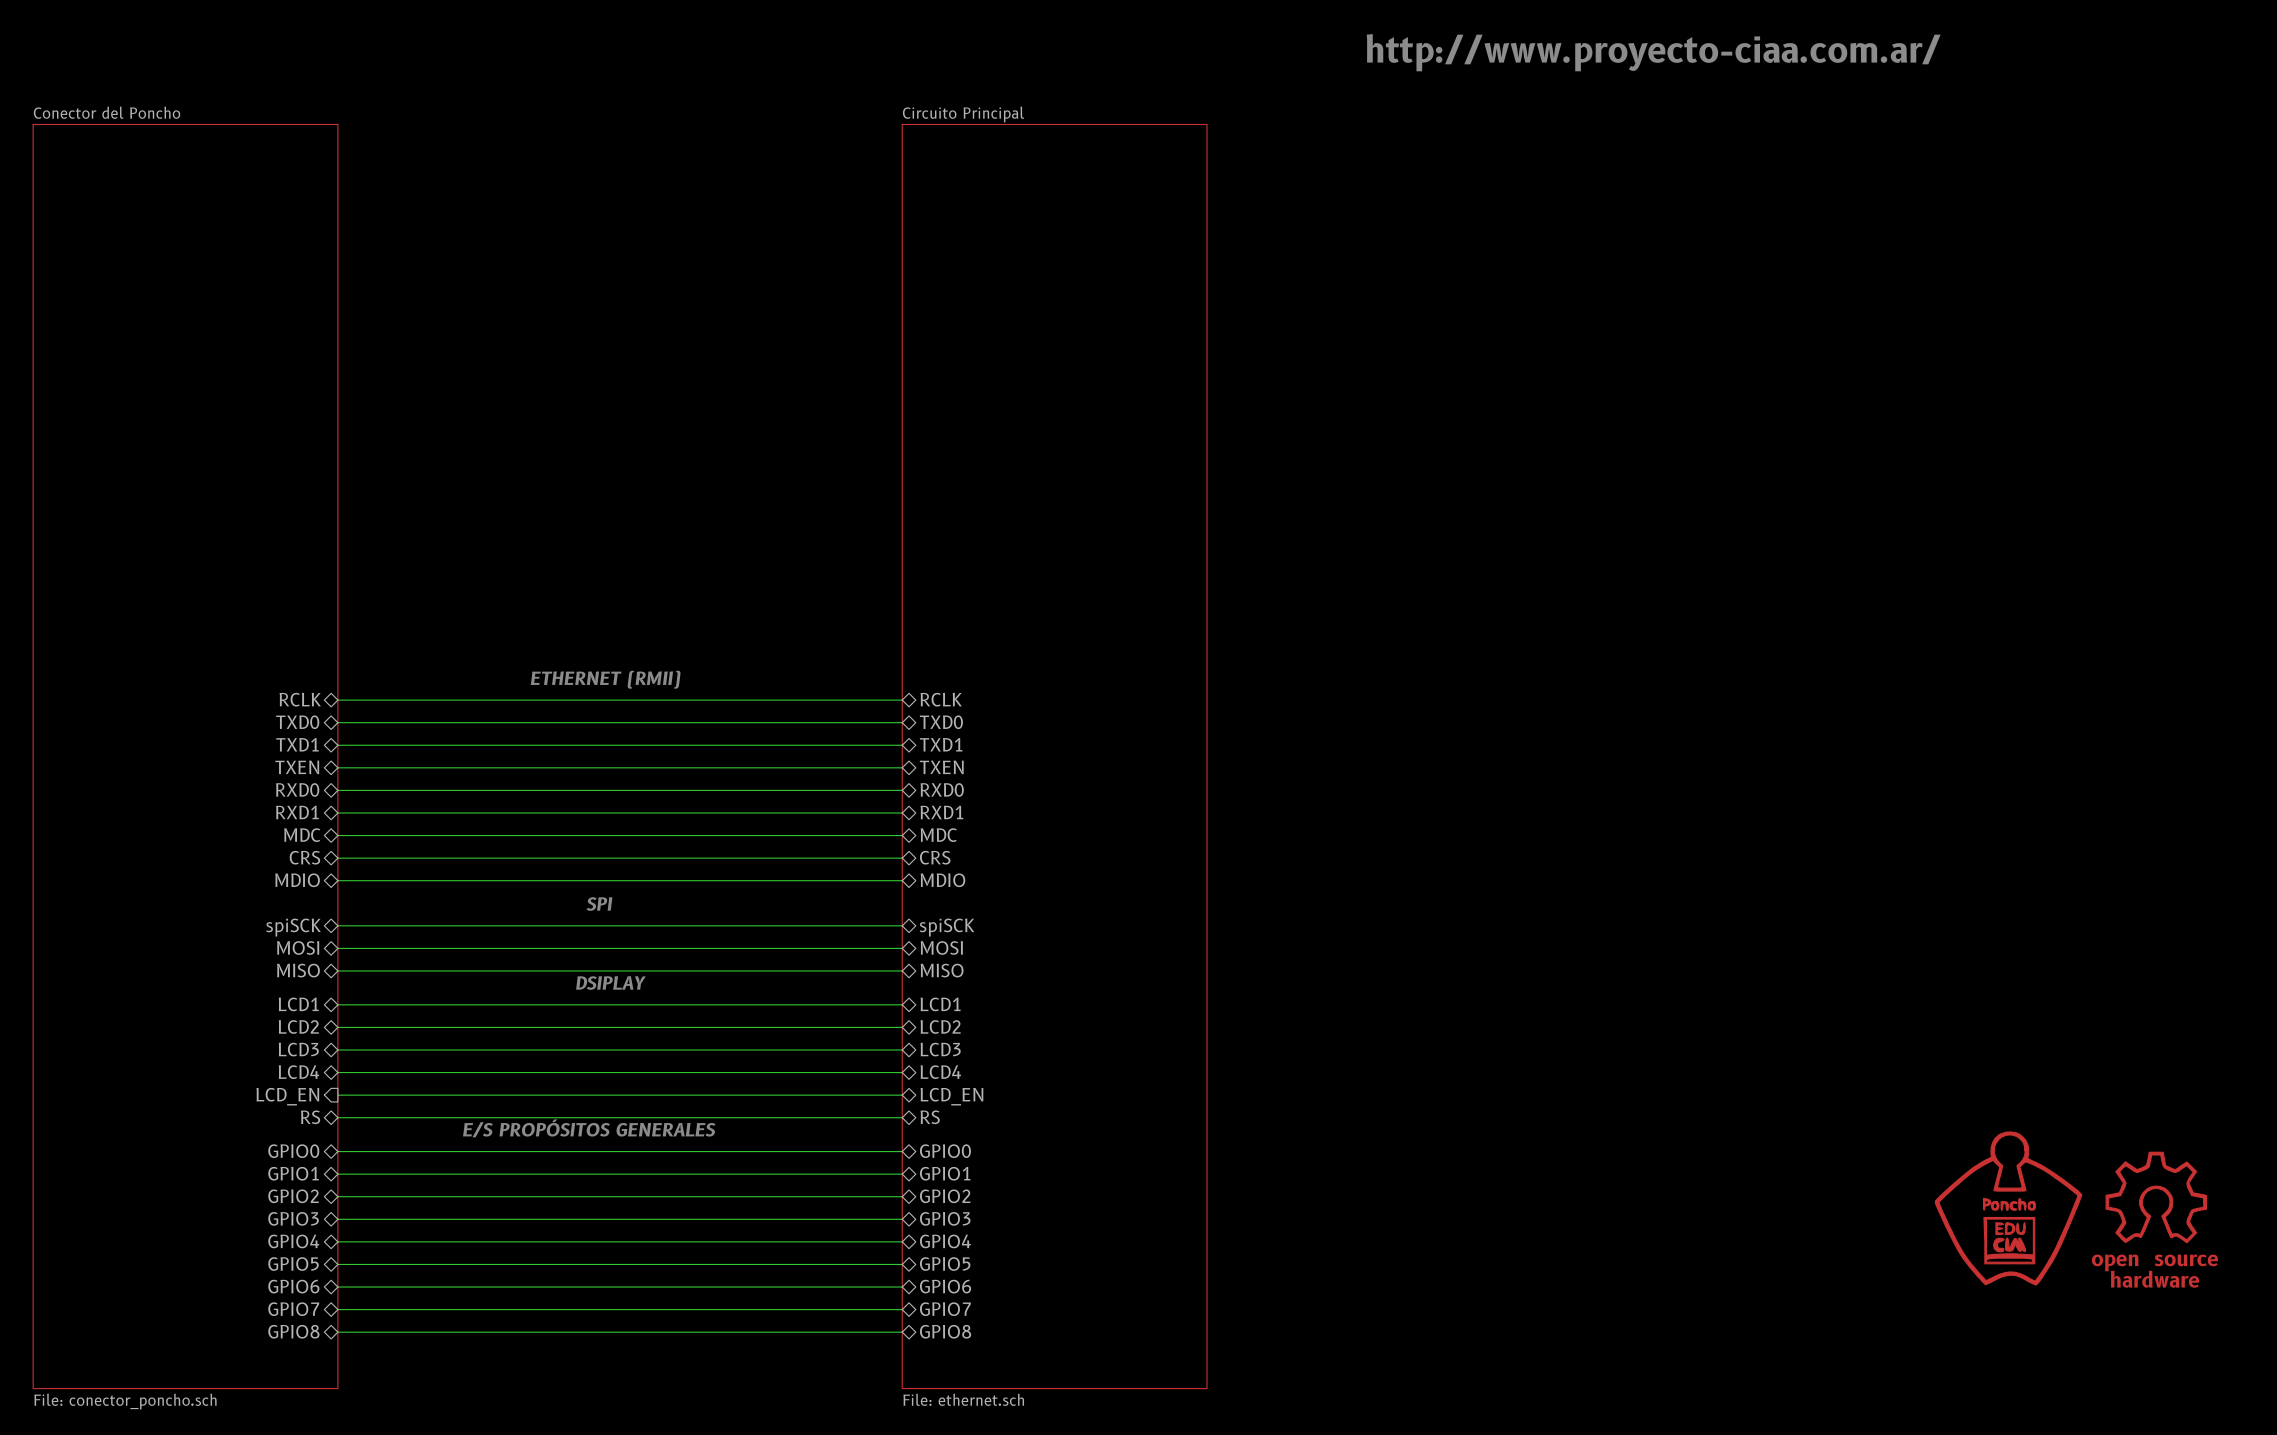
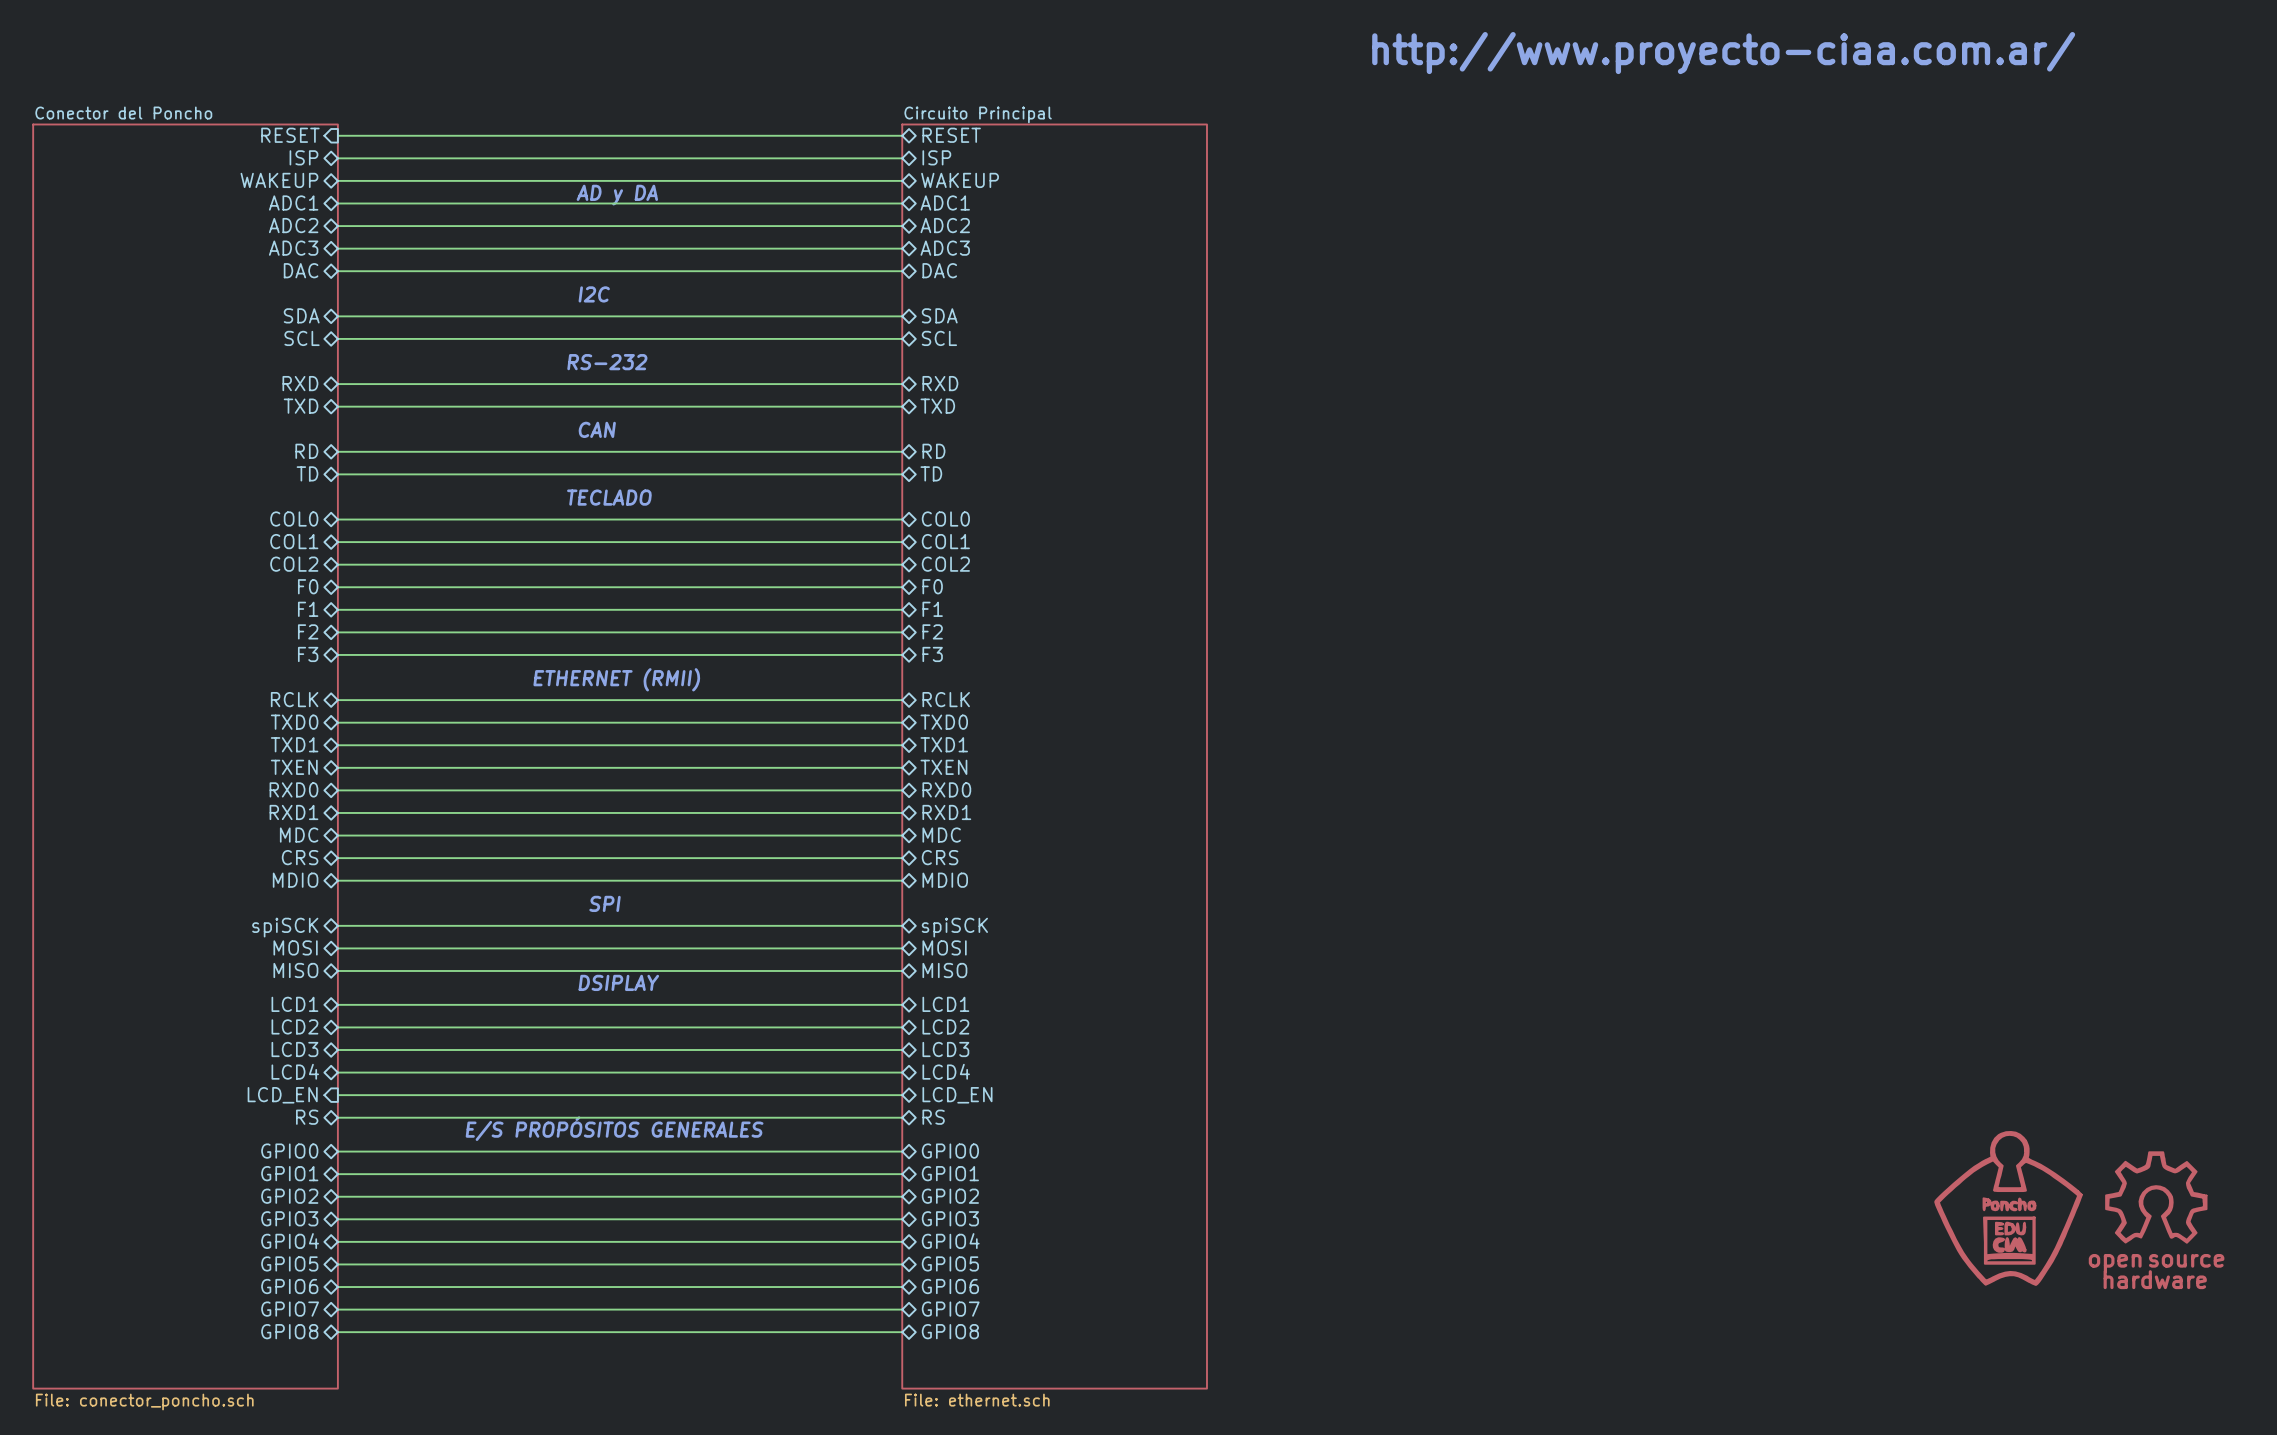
sheet pin: none -> RESET (290, 135)
wire: none -> (337, 135) (902, 135)
sheet pin: none -> RESET (951, 135)
sheet pin: none -> ISP (303, 157)
sheet pin: none -> ISP (936, 157)
wire: none -> (337, 158) (902, 158)
sheet pin: none -> WAKEUP (279, 180)
wire: none -> (337, 180) (902, 180)
sheet pin: none -> WAKEUP (960, 180)
text: none -> AD y DA (617, 195)
sheet pin: none -> ADC1 (293, 202)
wire: none -> (337, 203) (902, 203)
sheet pin: none -> ADC1 (945, 202)
sheet pin: none -> ADC2 (293, 225)
sheet pin: none -> ADC2 (945, 225)
wire: none -> (337, 226) (902, 226)
sheet pin: none -> ADC3 (293, 248)
wire: none -> (337, 248) (902, 248)
sheet pin: none -> ADC3 (945, 248)
sheet pin: none -> DAC (301, 270)
sheet pin: none -> DAC (939, 270)
wire: none -> (337, 271) (902, 271)
text: none -> I2C (594, 294)
sheet pin: none -> SDA (301, 315)
sheet pin: none -> SDA (939, 315)
wire: none -> (337, 316) (902, 316)
sheet pin: none -> SCL (302, 338)
wire: none -> (337, 338) (902, 338)
sheet pin: none -> SCL (939, 338)
text: none -> RS-232 (607, 362)
sheet pin: none -> RXD (300, 383)
sheet pin: none -> RXD (940, 383)
wire: none -> (337, 384) (902, 384)
sheet pin: none -> TXD (301, 406)
wire: none -> (337, 406) (902, 406)
sheet pin: none -> TXD (937, 406)
text: none -> CAN (597, 429)
sheet pin: none -> RD (306, 451)
wire: none -> (337, 451) (902, 451)
sheet pin: none -> RD (933, 451)
sheet pin: none -> TD (307, 473)
sheet pin: none -> TD (931, 473)
wire: none -> (337, 474) (902, 474)
text: none -> TECLADO (609, 497)
sheet pin: none -> COL0 (294, 519)
wire: none -> (337, 519) (902, 519)
sheet pin: none -> COL0 (945, 519)
sheet pin: none -> COL1 (294, 541)
sheet pin: none -> COL1 (945, 541)
wire: none -> (337, 542) (902, 542)
sheet pin: none -> COL2 (294, 564)
wire: none -> (337, 564) (902, 564)
sheet pin: none -> COL2 (945, 564)
sheet pin: none -> F0 (308, 586)
sheet pin: none -> F0 (932, 586)
wire: none -> (337, 587) (902, 587)
sheet pin: none -> F1 (308, 609)
wire: none -> (337, 609) (902, 609)
sheet pin: none -> F1 (932, 609)
sheet pin: none -> F2 (308, 631)
sheet pin: none -> F2 (932, 631)
wire: none -> (337, 632) (902, 632)
sheet pin: none -> F3 (308, 654)
wire: none -> (337, 654) (902, 654)
sheet pin: none -> F3 (932, 654)

